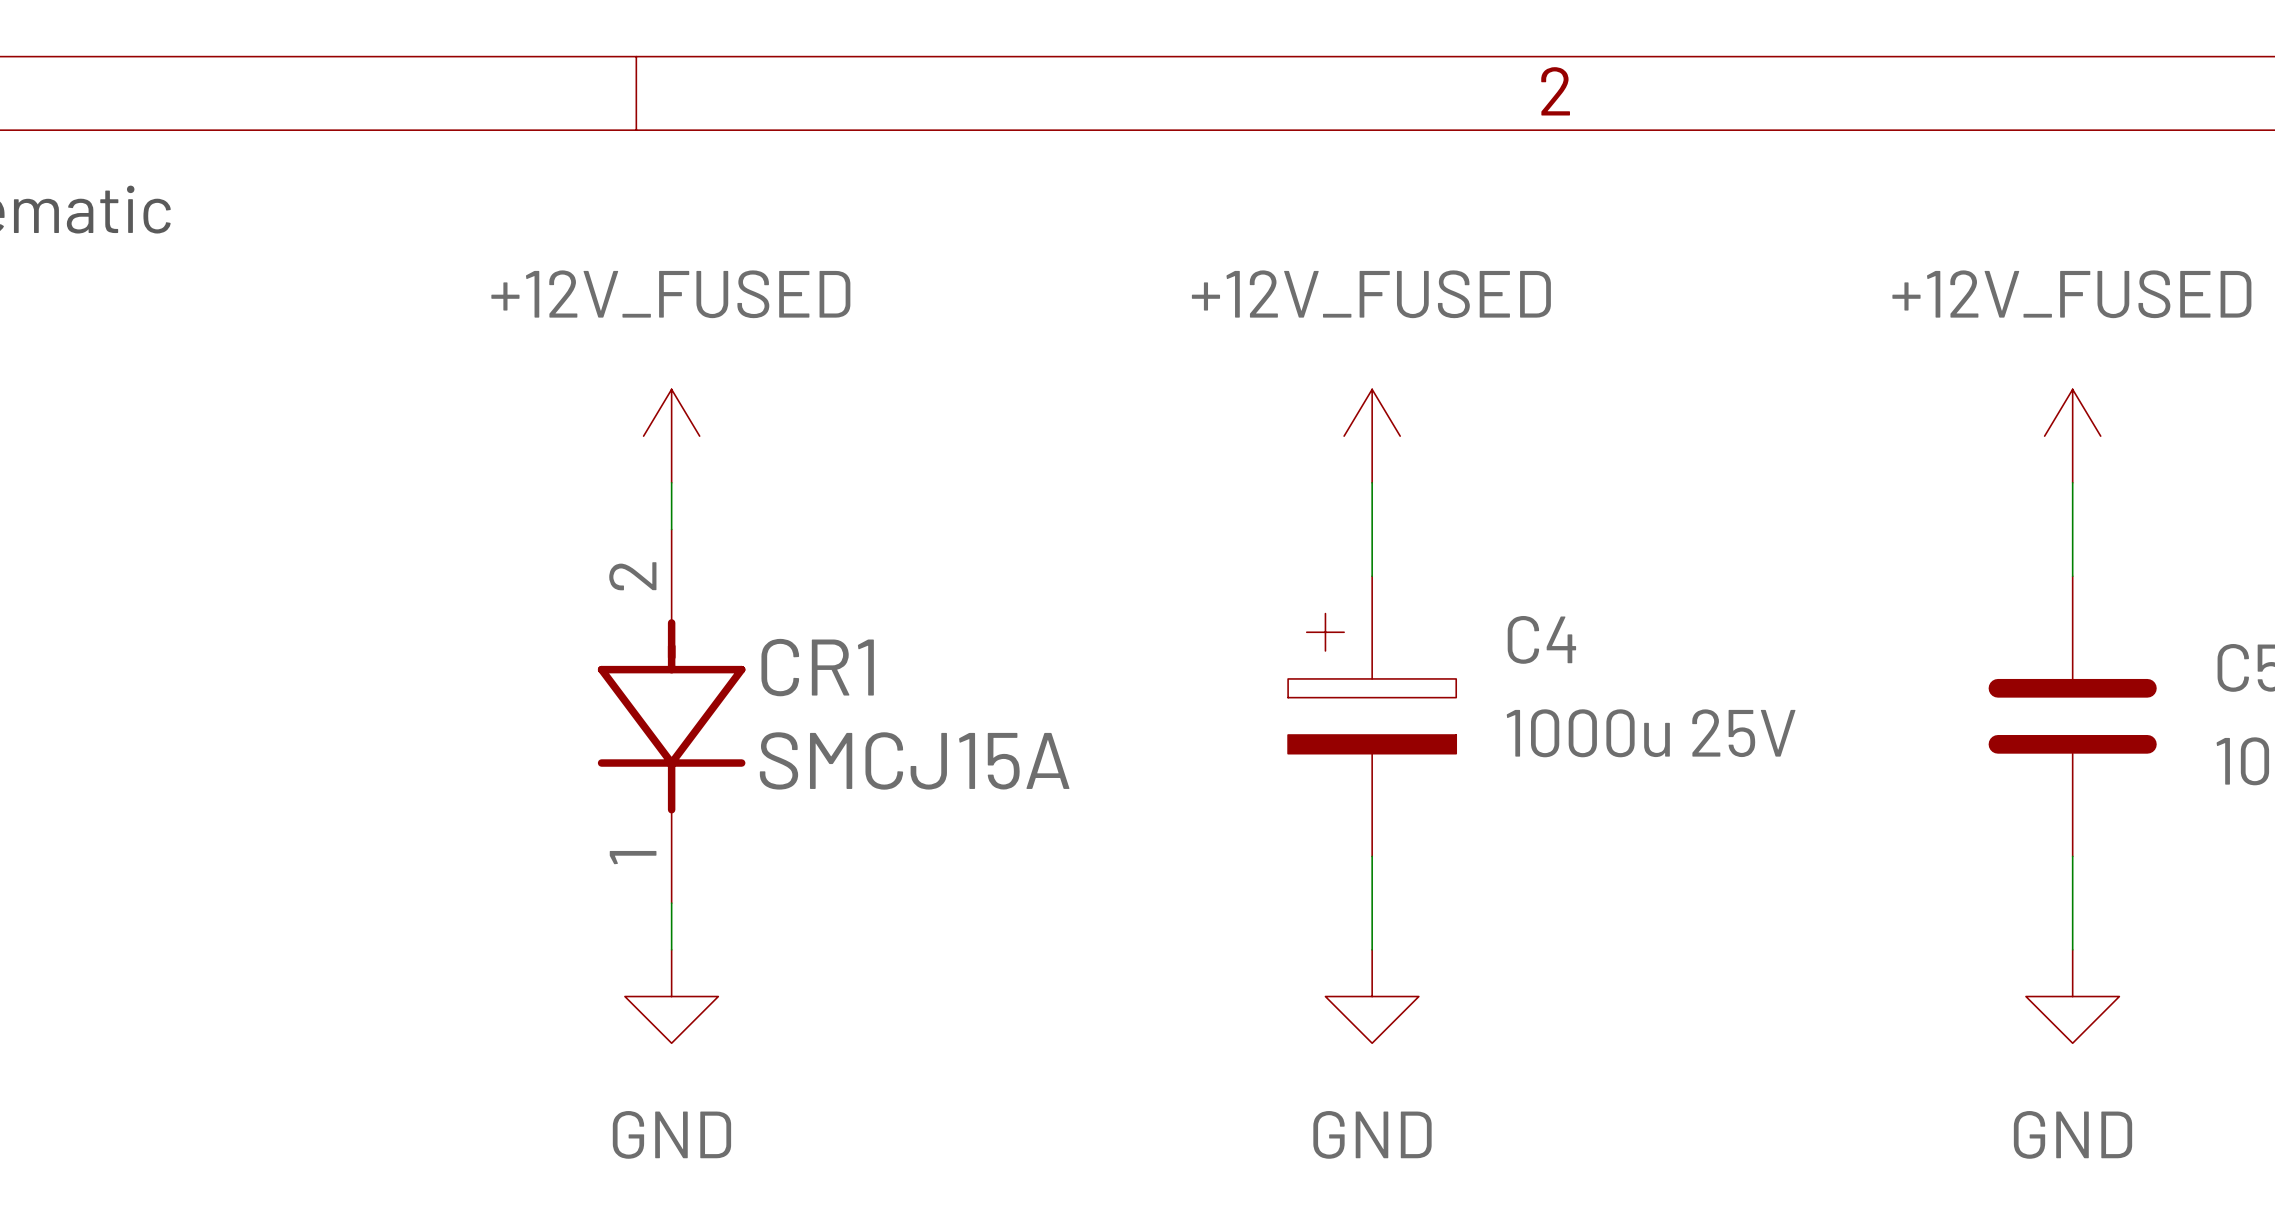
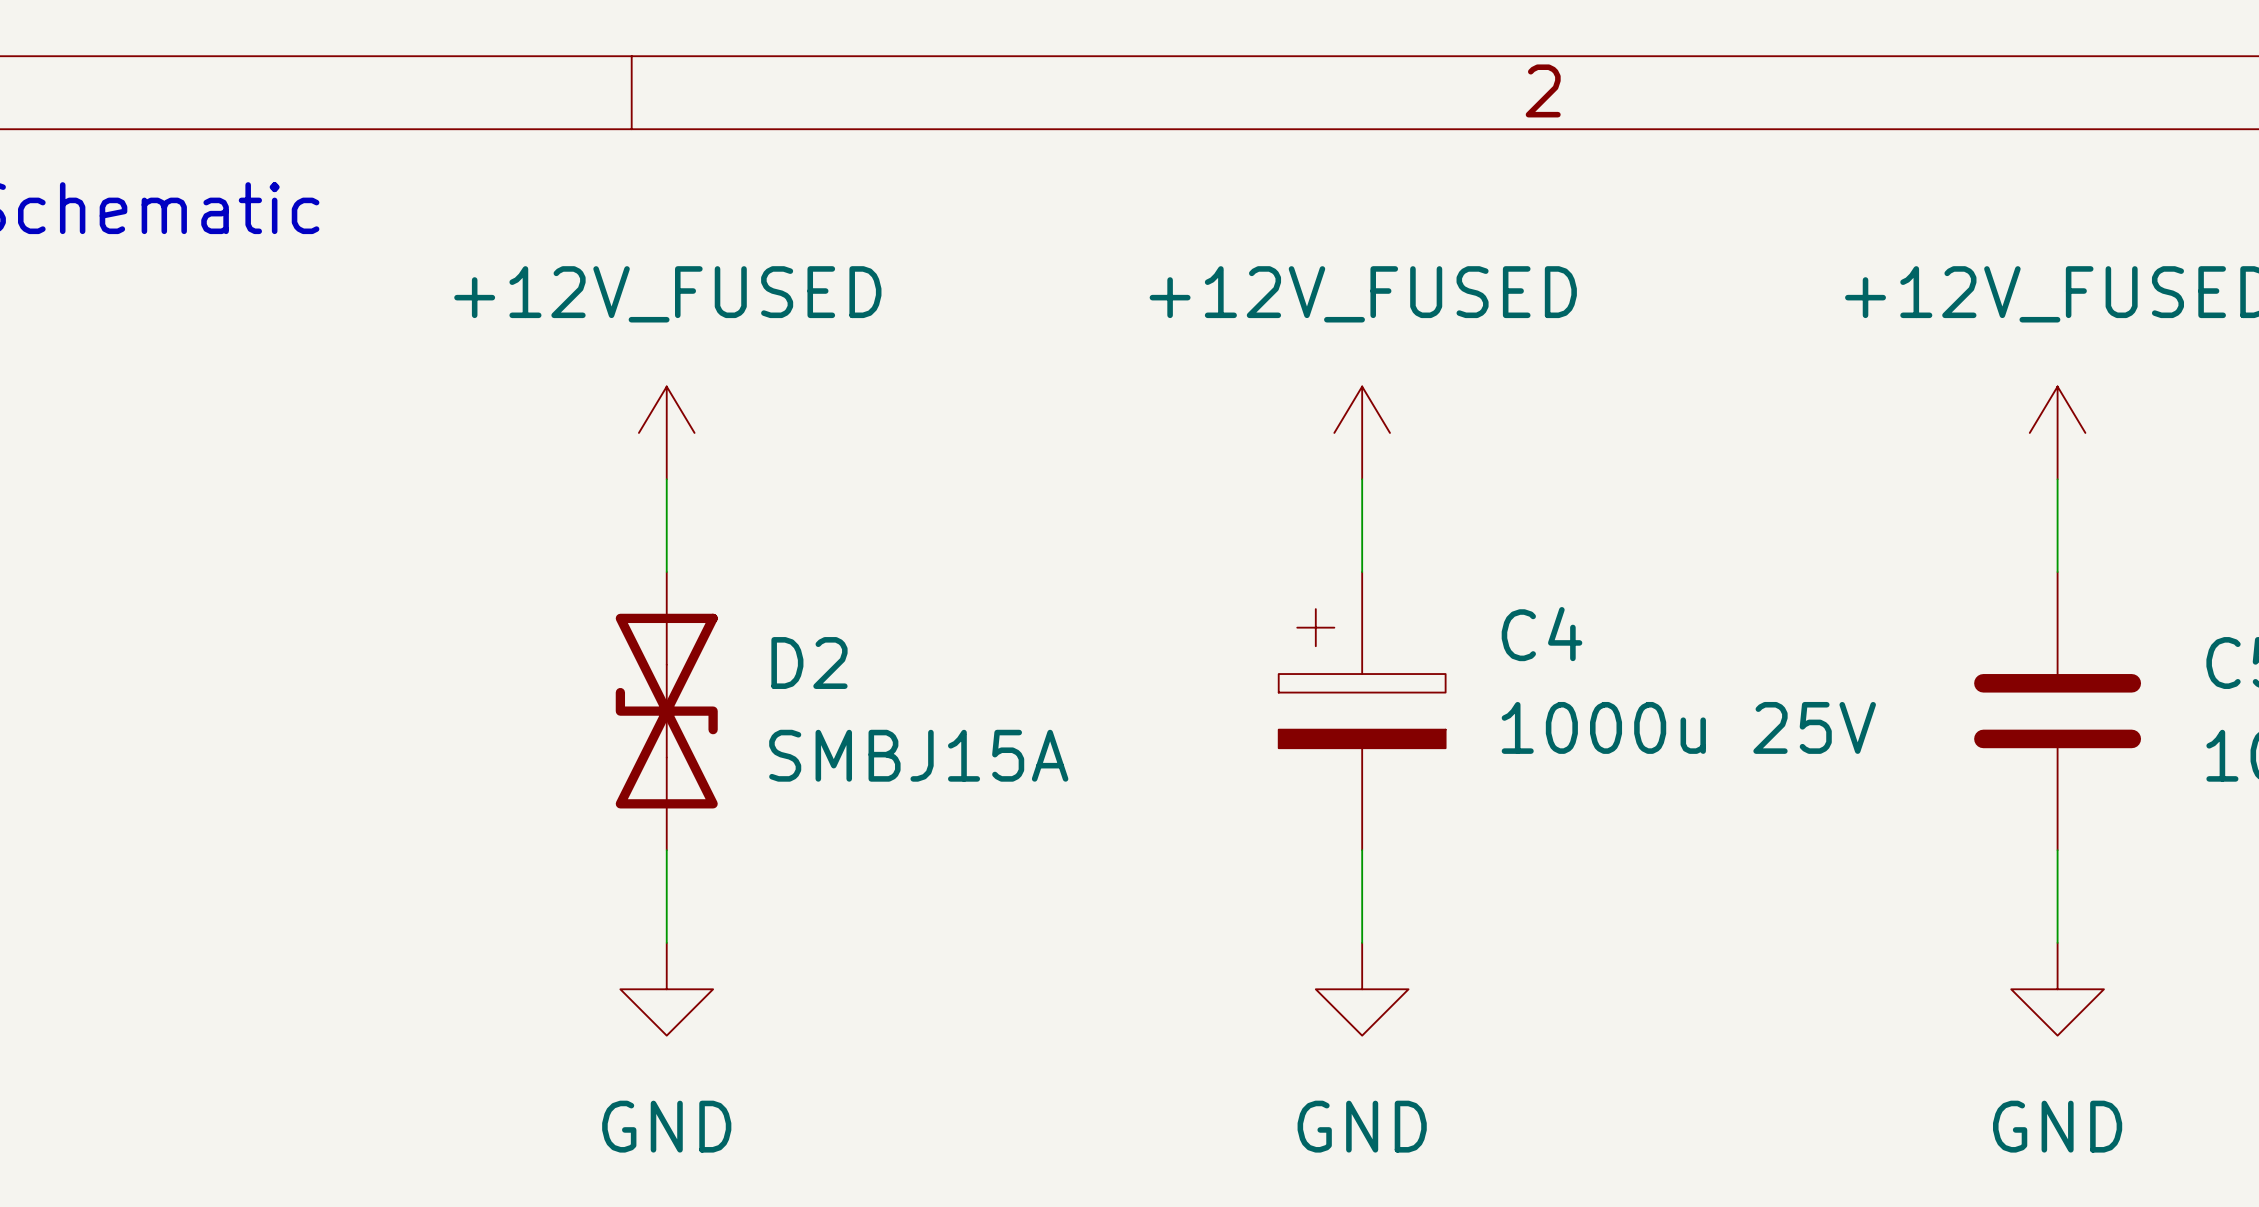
CR1: SMCJ15A (671, 716) -> none
D2: none -> SMBJ15A (666, 711)

